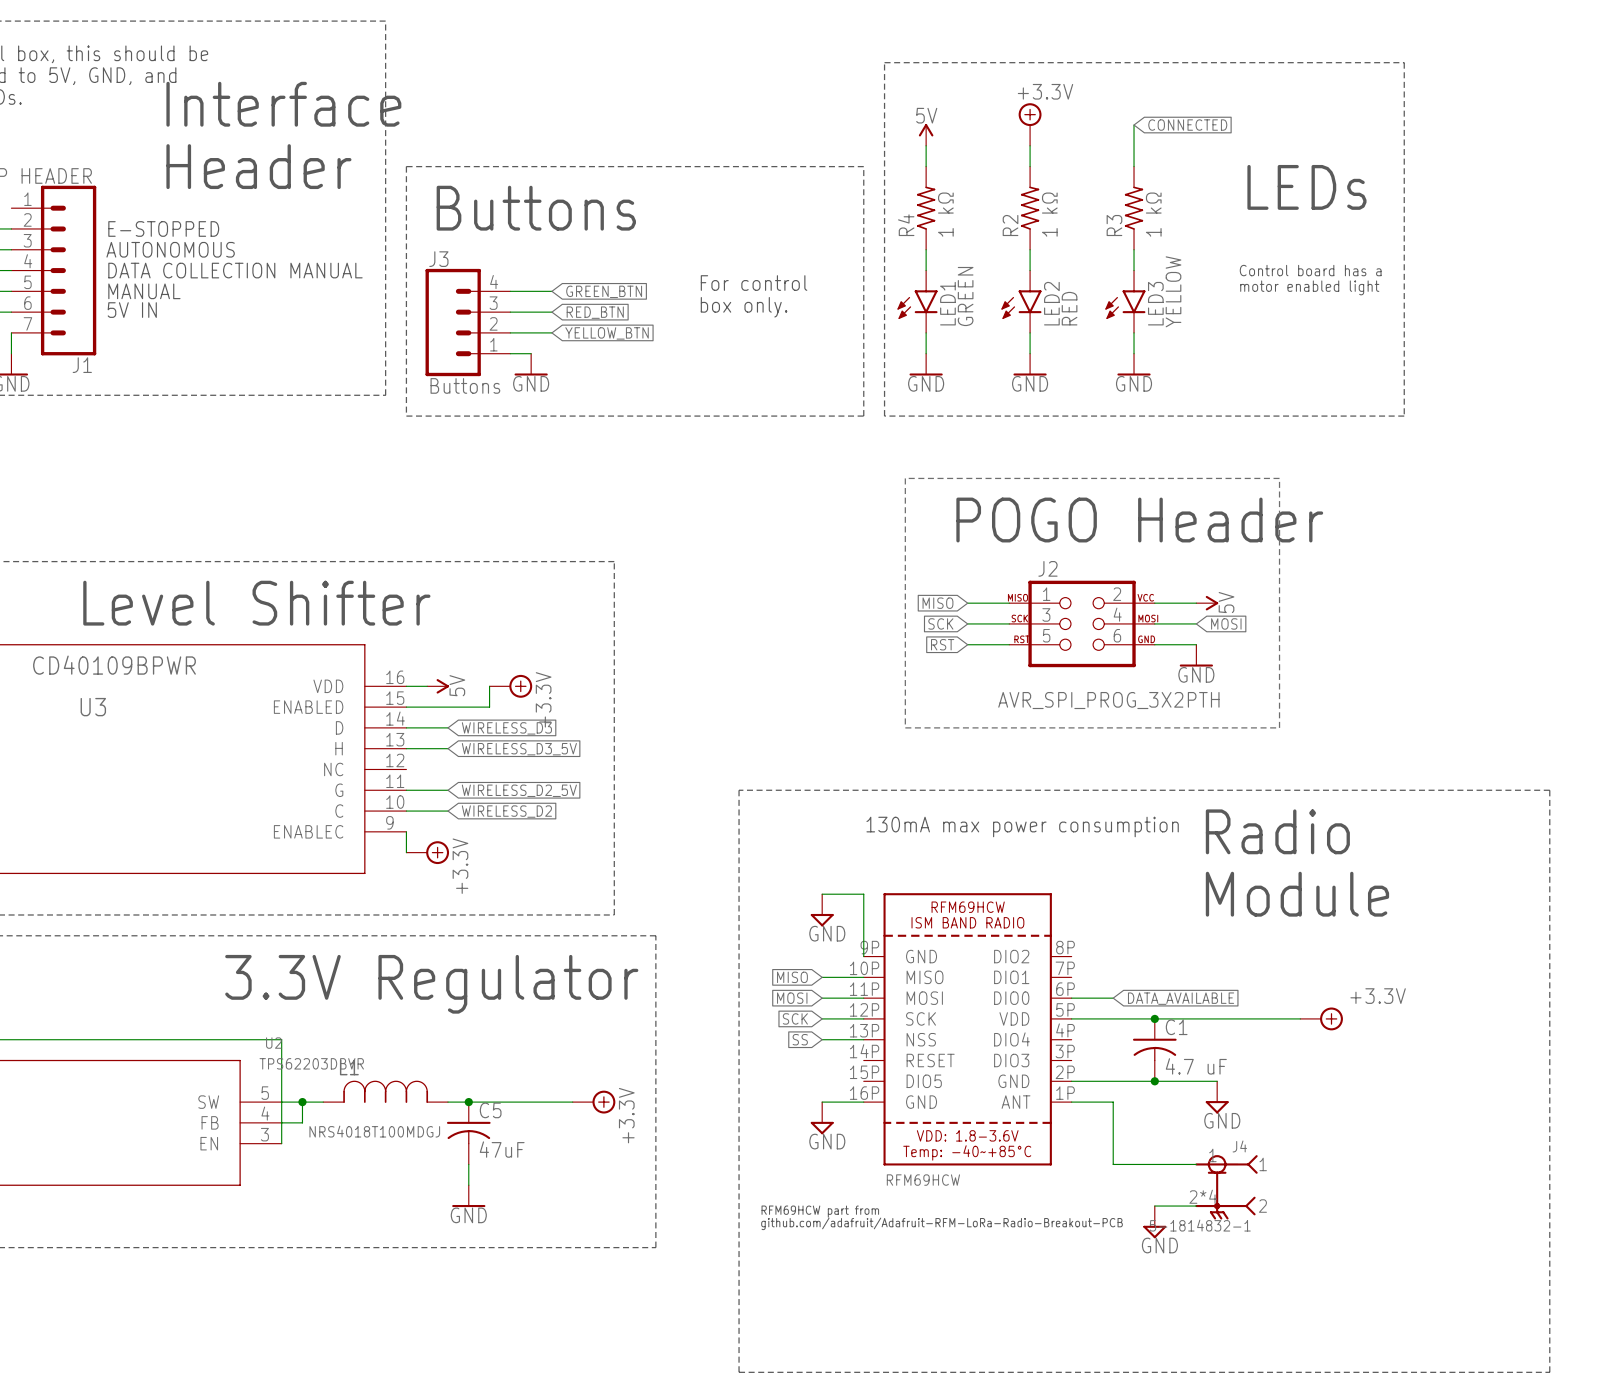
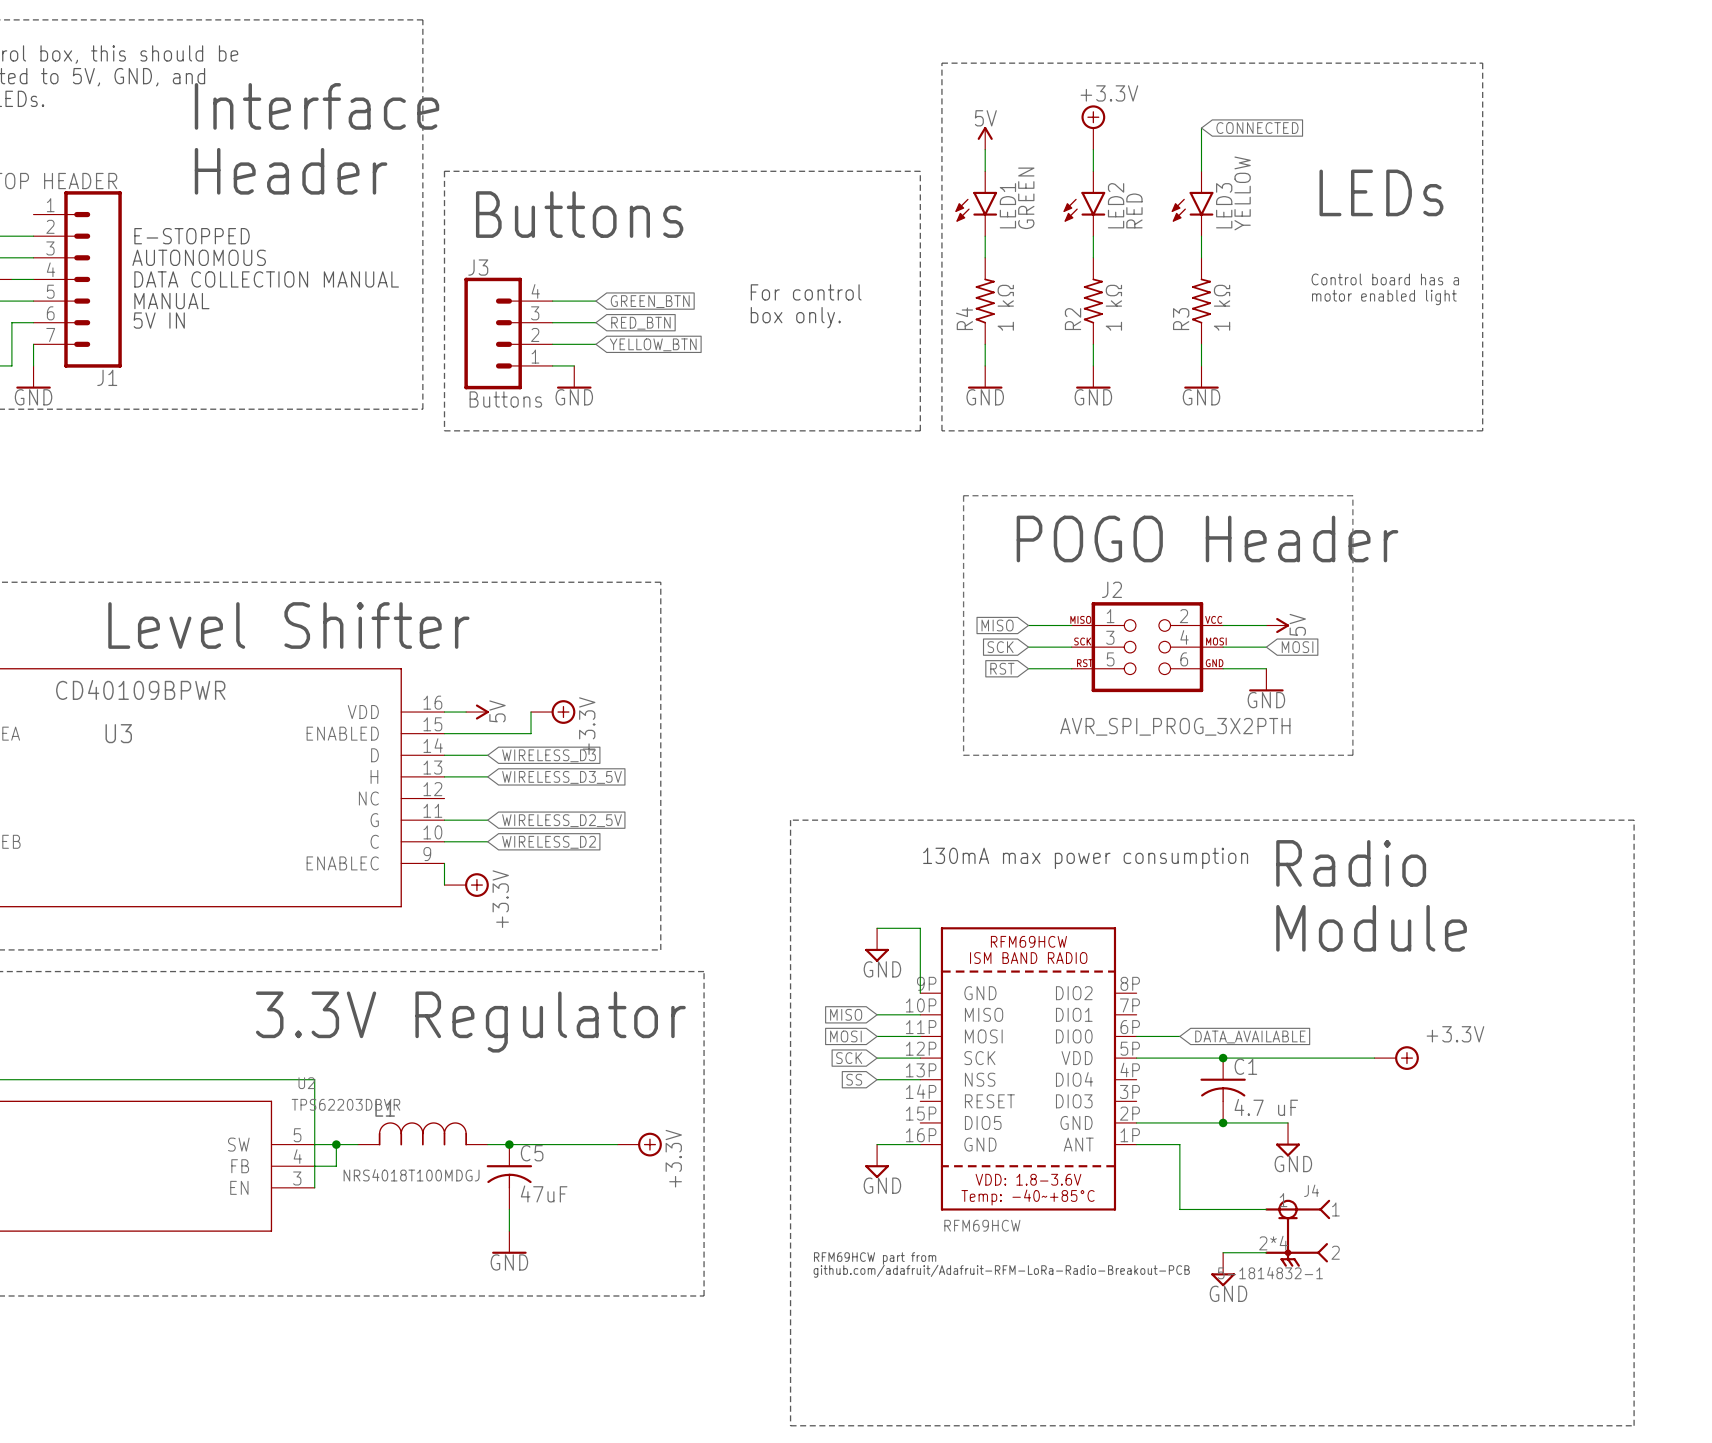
R4 position: (926, 208) -> (985, 301)
R2 position: (1030, 208) -> (1093, 301)
R3 position: (1134, 208) -> (1201, 301)
LED1 position: (917, 301) -> (976, 203)
LED2 position: (1021, 301) -> (1084, 203)
LED3 position: (1125, 301) -> (1192, 203)

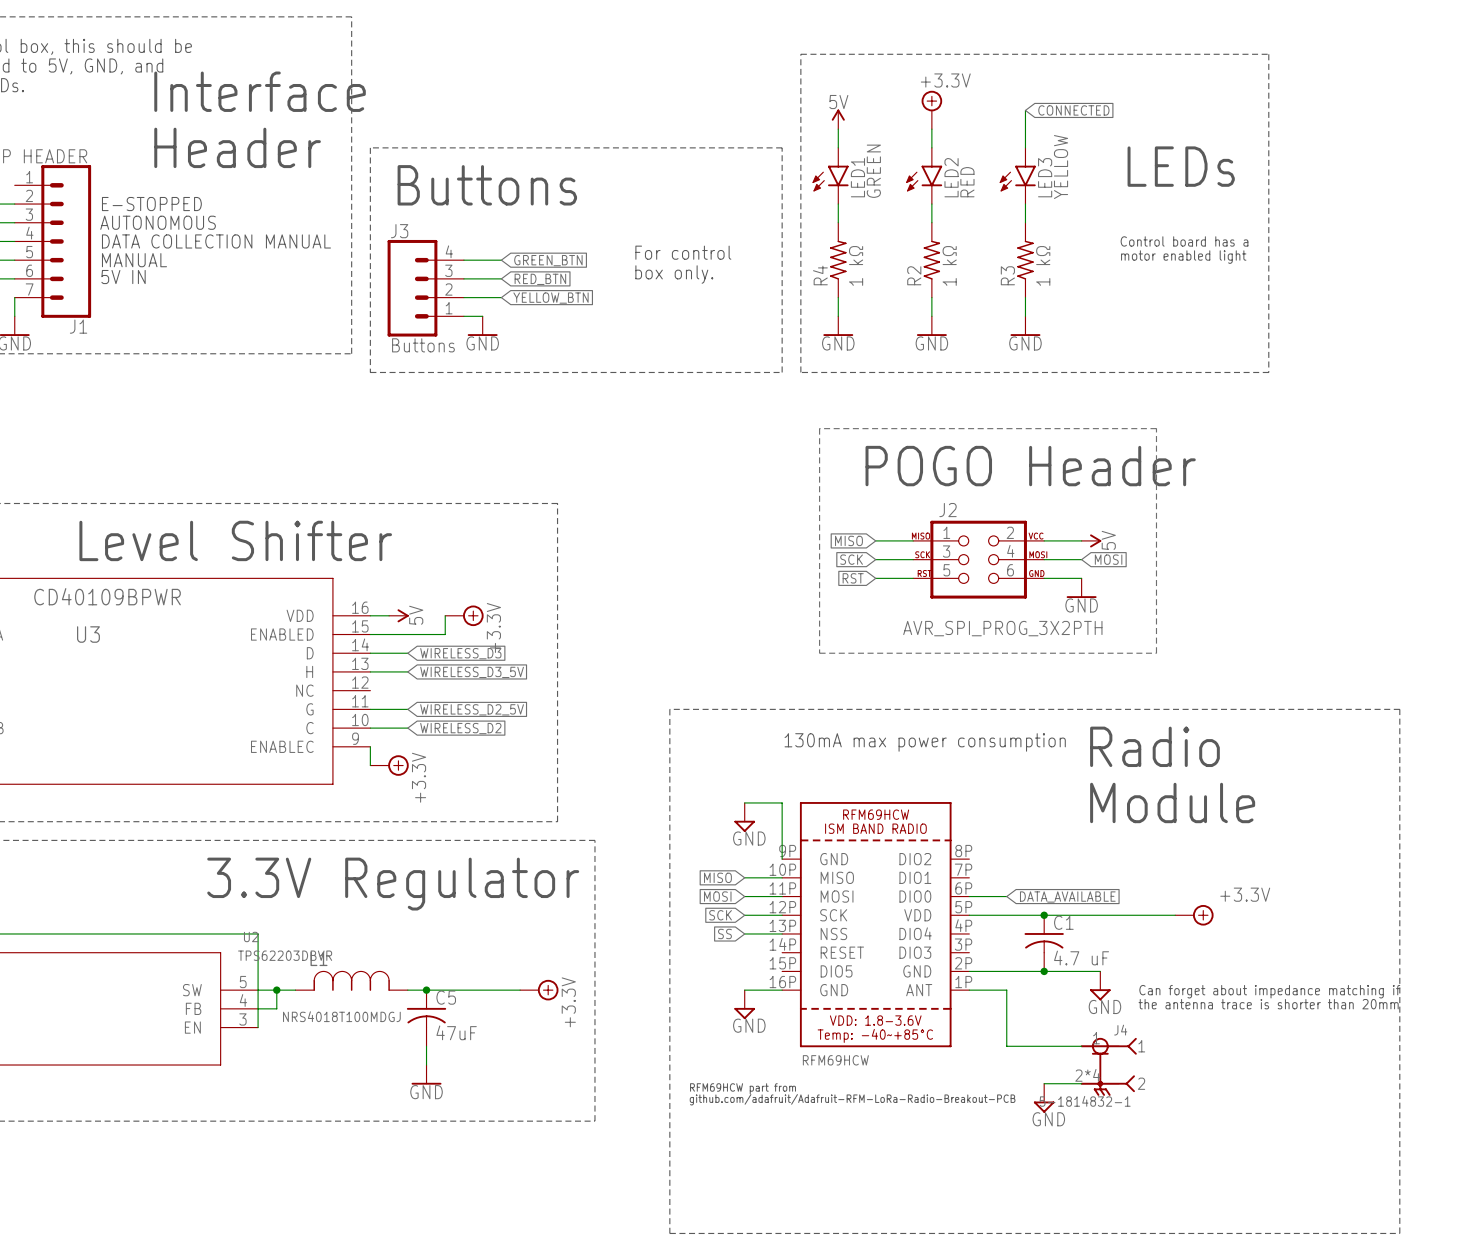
text: none -> Can forget about impedance matching if (1269, 991)
text: none -> the antenna trace is shorter than 20mm (1268, 1004)

